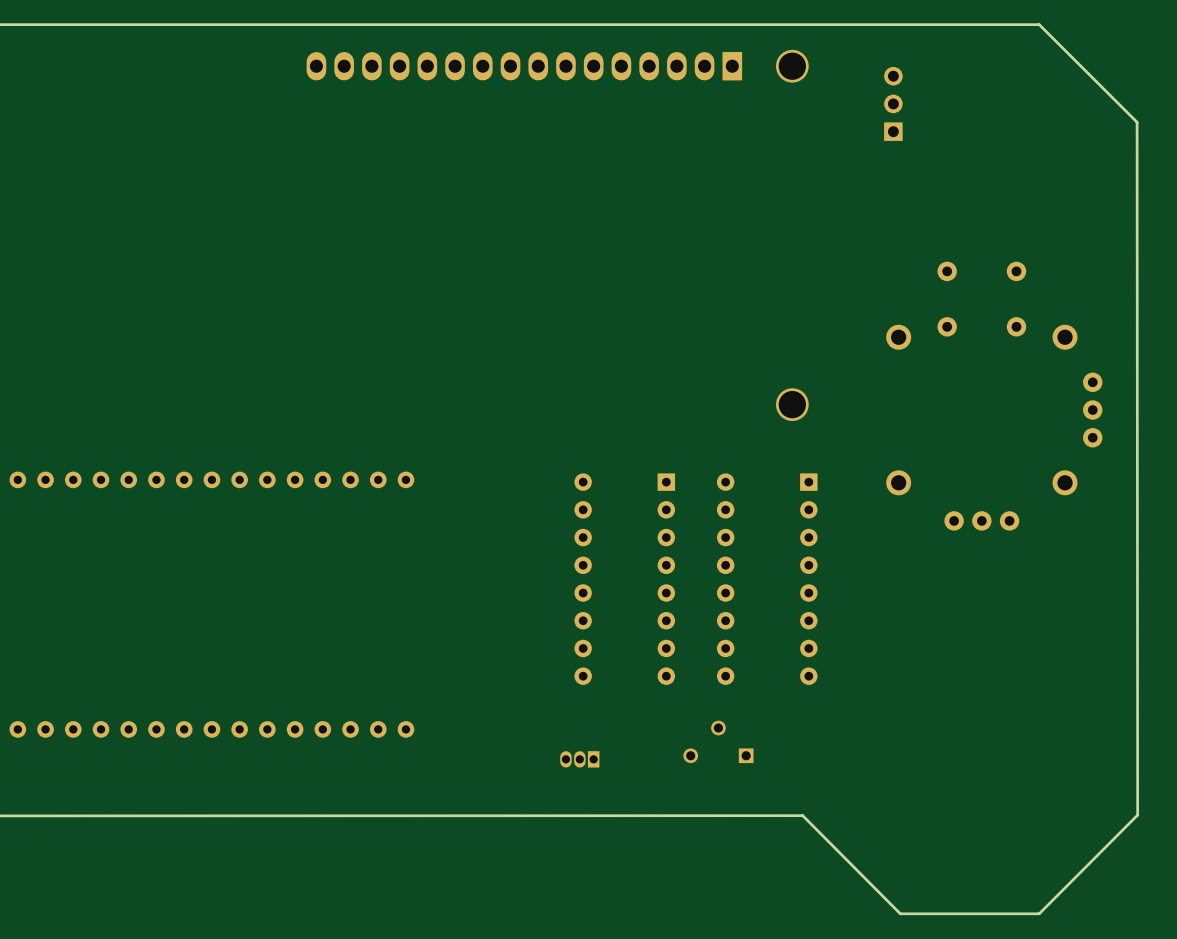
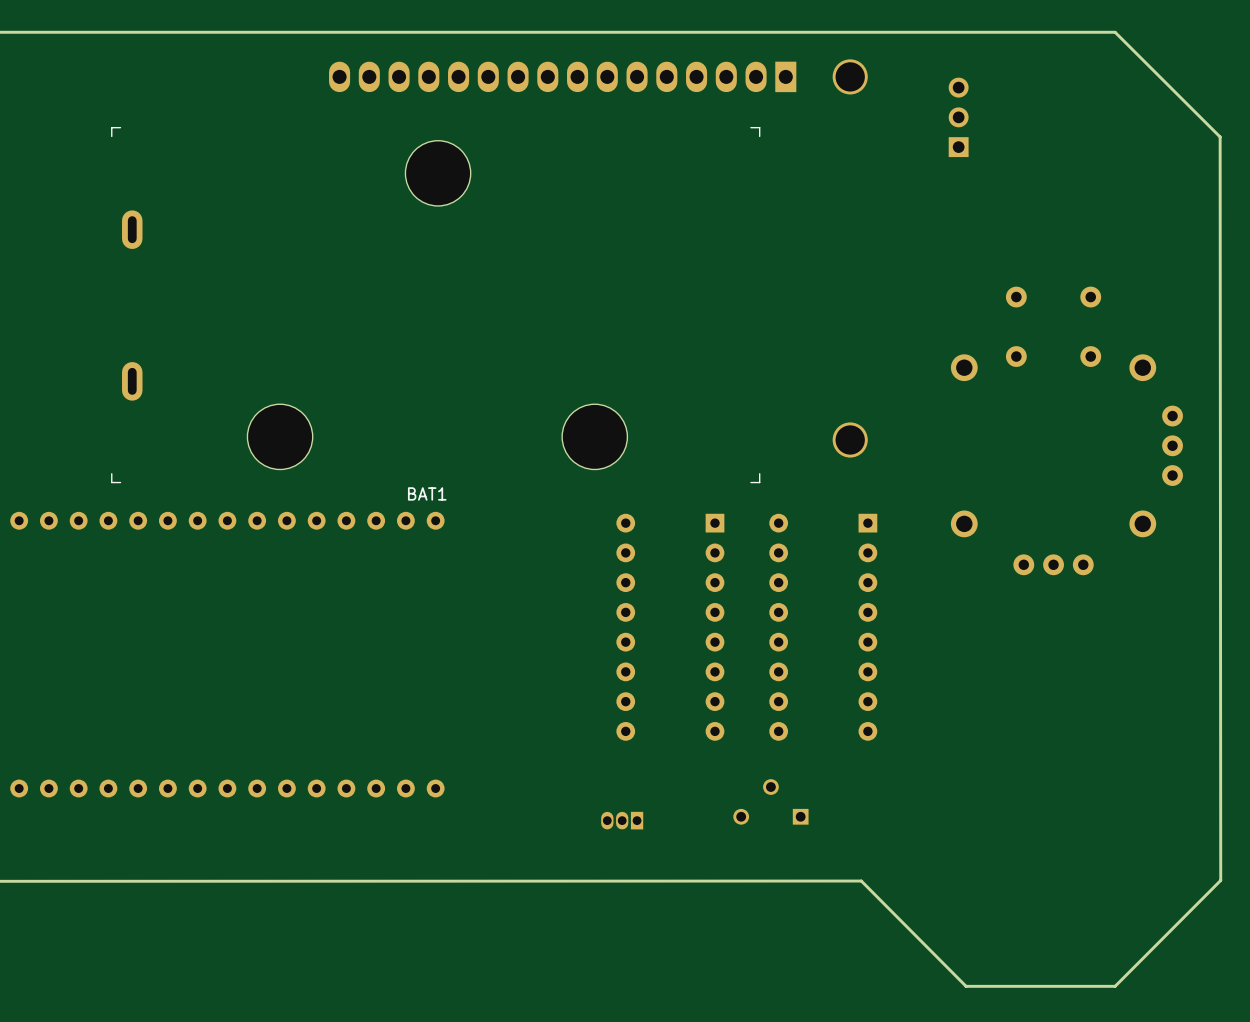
BAT1: none -> (435, 305)

